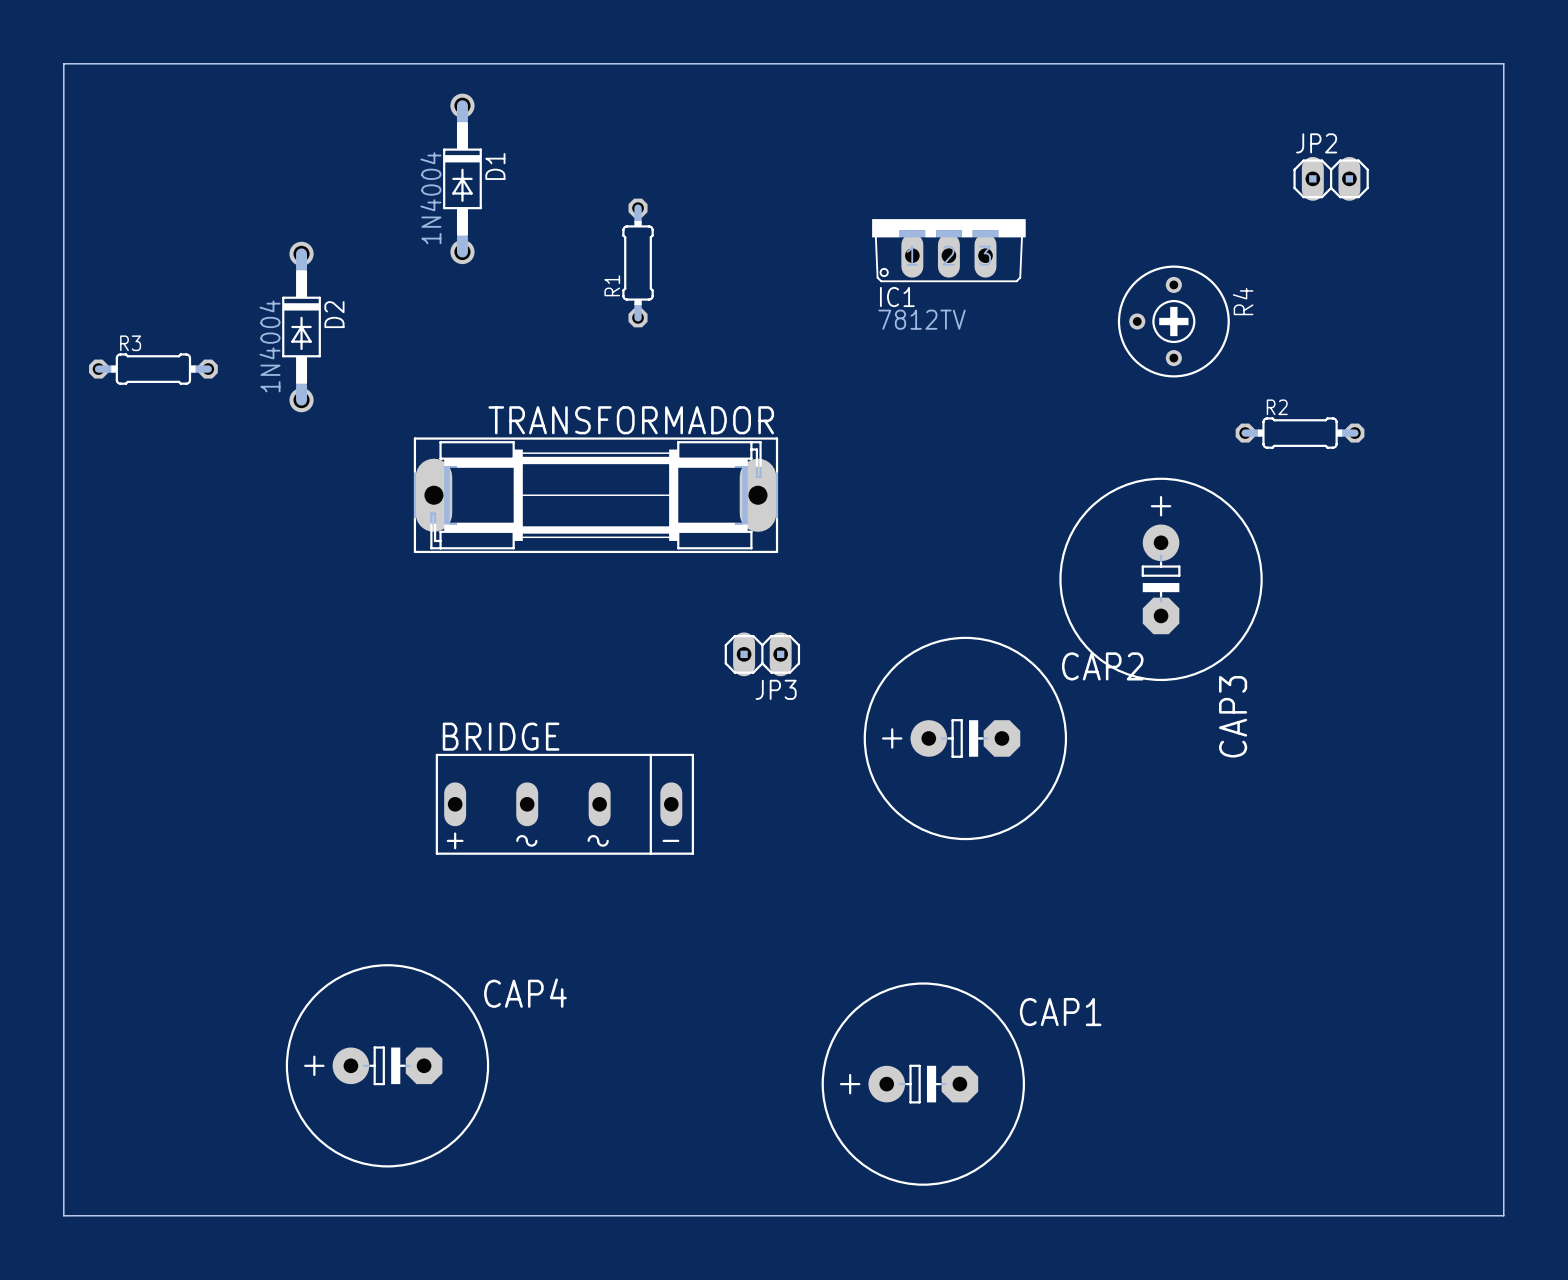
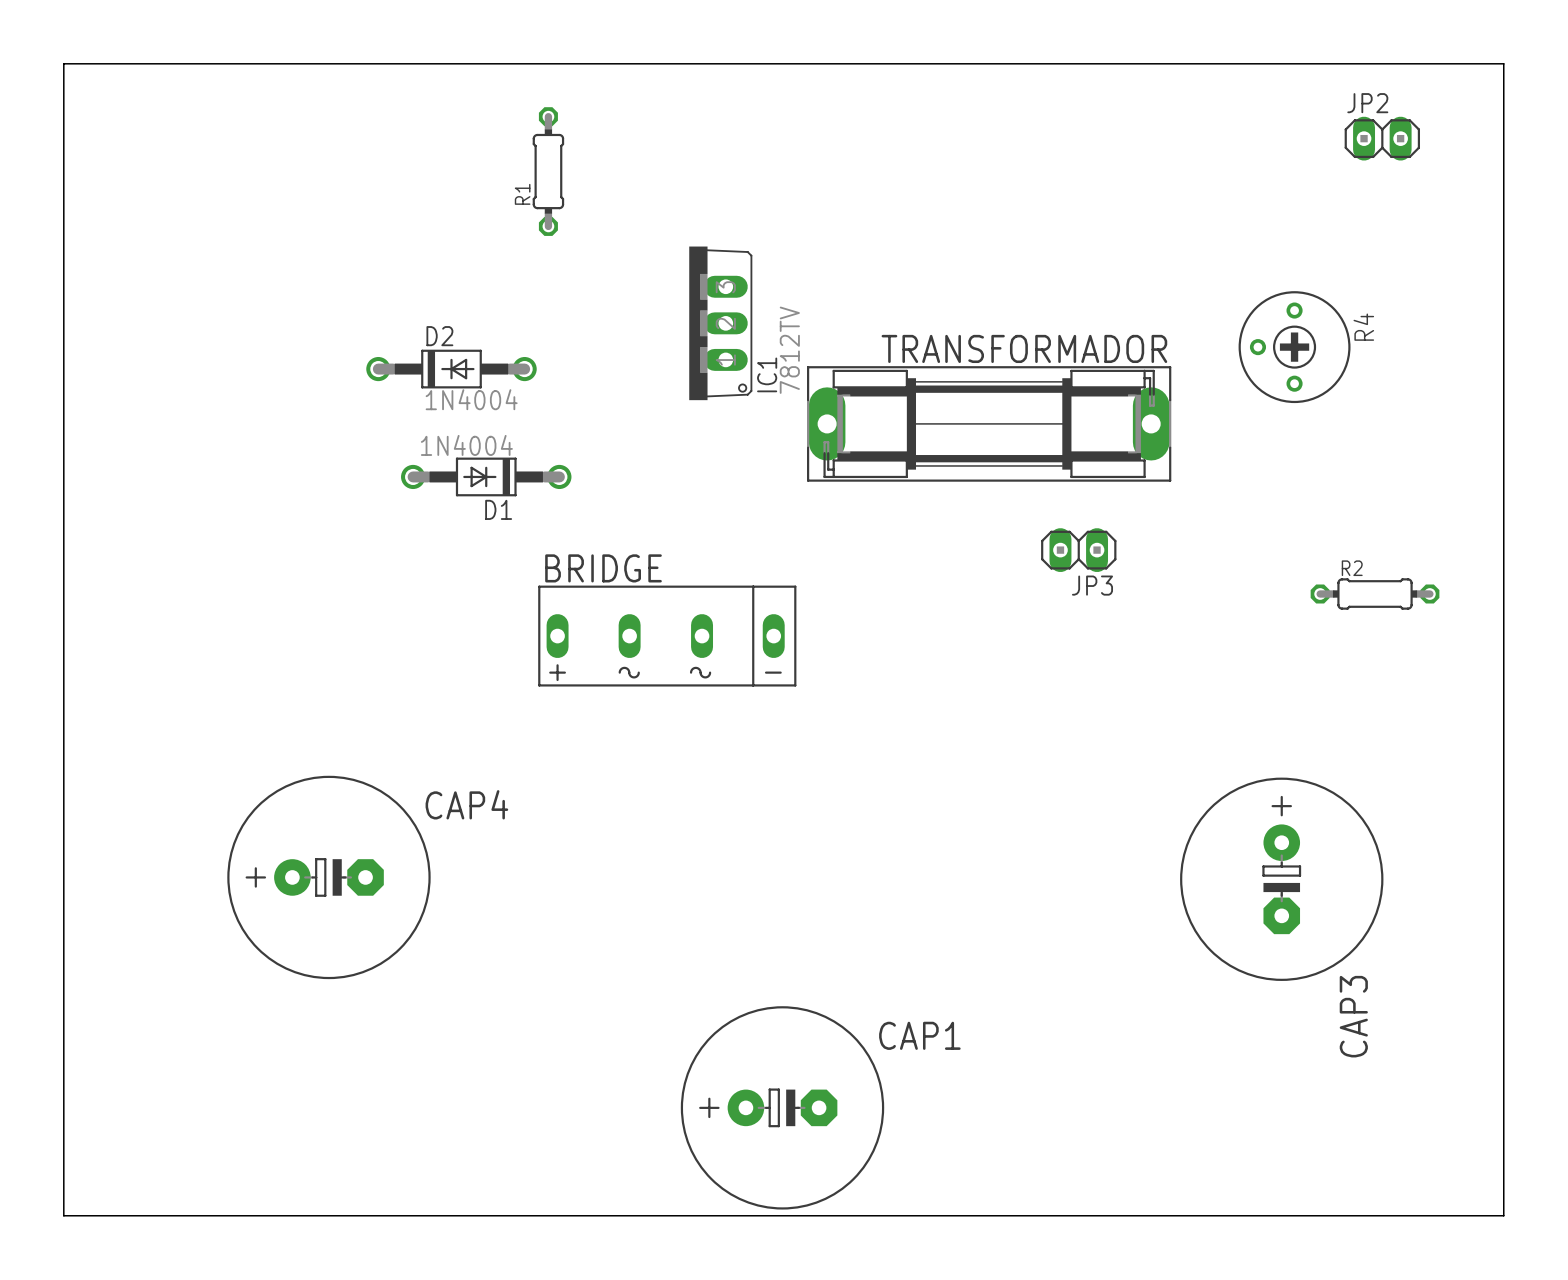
D1 rotation: 0° (462, 178) -> 90° clockwise (486, 476)
D1 position: (462, 178) -> (486, 476)
JP2 position: (1331, 178) -> (1382, 138)
IC1 rotation: 0° (948, 250) -> 90° counterclockwise (720, 323)
IC1 position: (948, 250) -> (720, 323)
R1 position: (638, 262) -> (548, 171)
R4 position: (1173, 321) -> (1294, 347)
D2 rotation: 0° (301, 327) -> 90° counterclockwise (451, 369)
D2 position: (301, 327) -> (451, 369)
R3: (153, 369) -> none
TRANSFORMADOR: none -> (989, 423)
R2 position: (1300, 433) -> (1375, 593)
TRANSFORMADOR: (595, 495) -> none
CAP3 position: (1161, 579) -> (1281, 879)
JP3 position: (762, 654) -> (1078, 550)
CAP2: (965, 738) -> none
BRIDGE position: (564, 804) -> (667, 636)
CAP4 position: (387, 1065) -> (328, 877)
CAP1 position: (923, 1084) -> (782, 1107)

